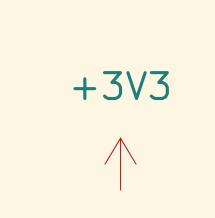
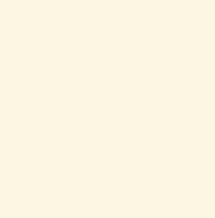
power symbol: +3V3 (120, 164) -> none

